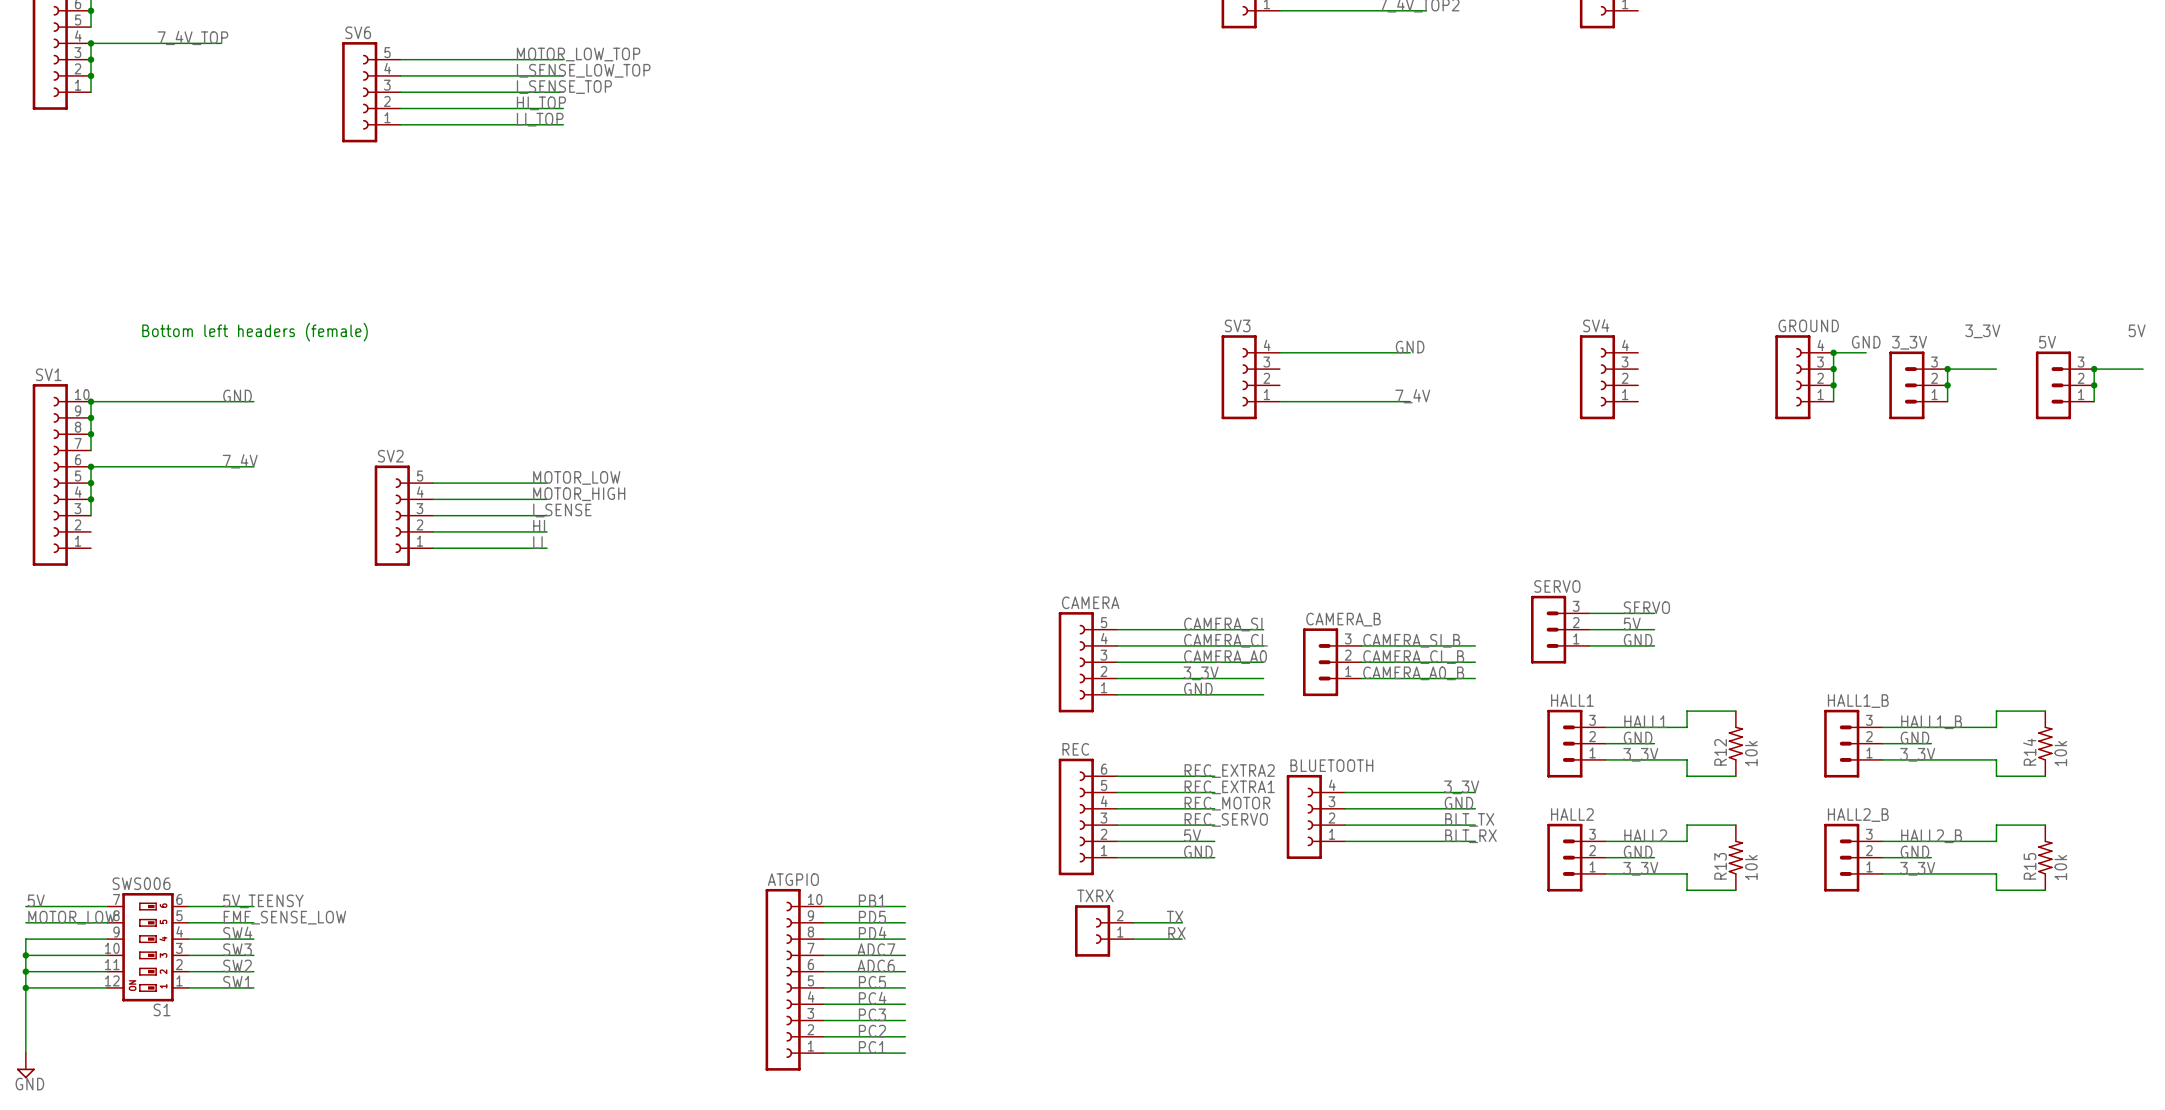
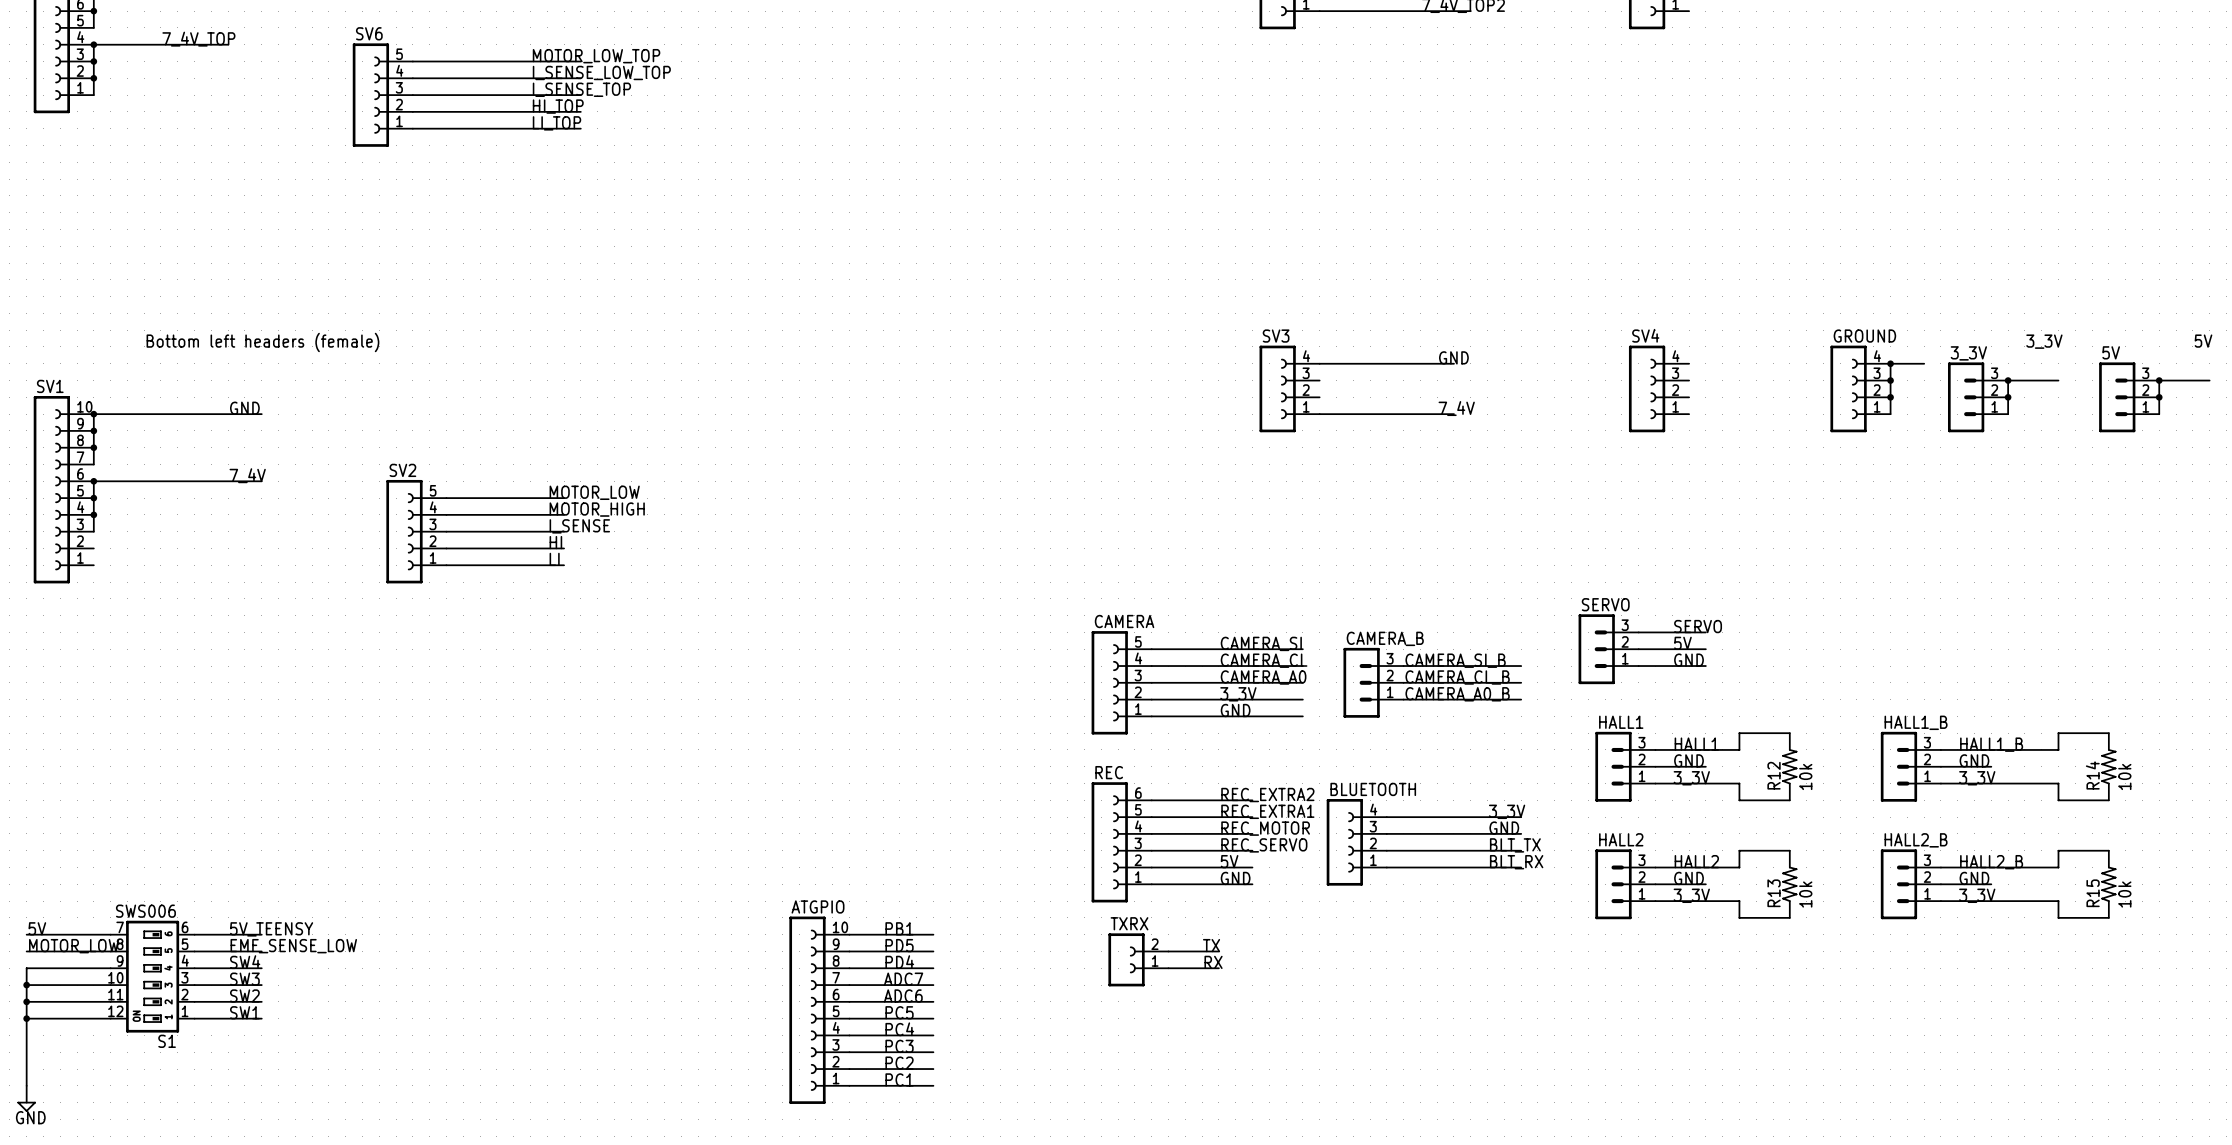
label: GND (1866, 342) -> none

